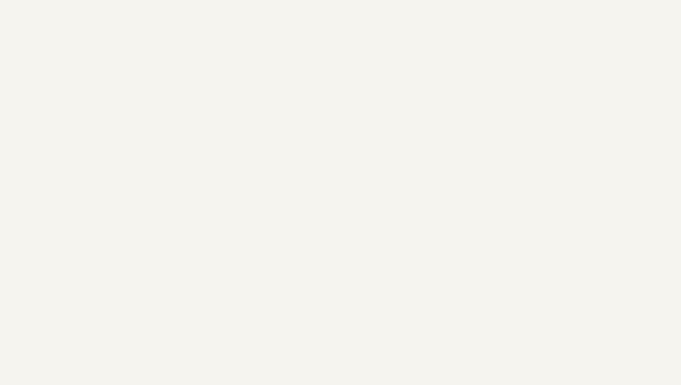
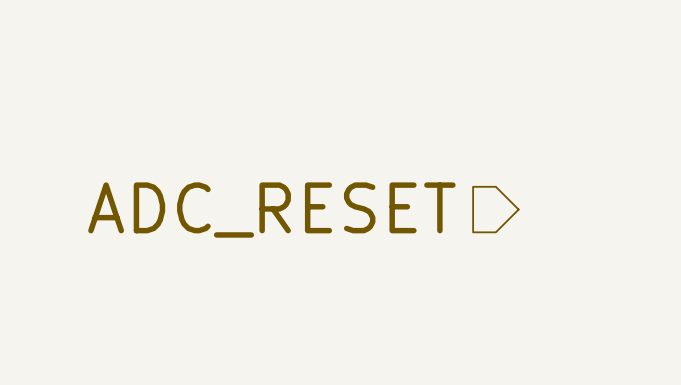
hierarchical label: none -> ADC_RESET (271, 210)

